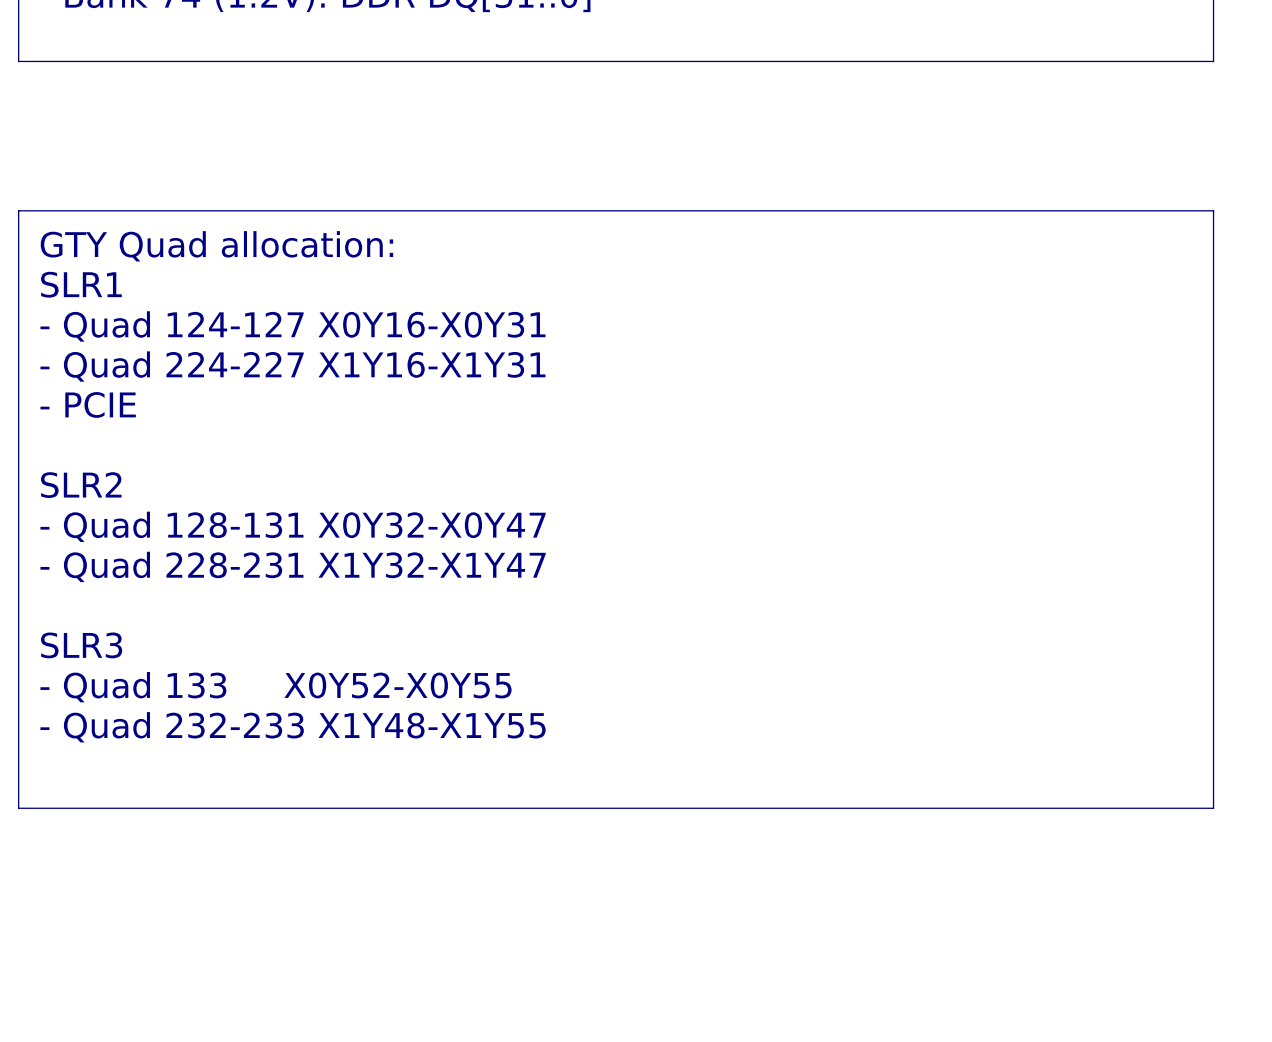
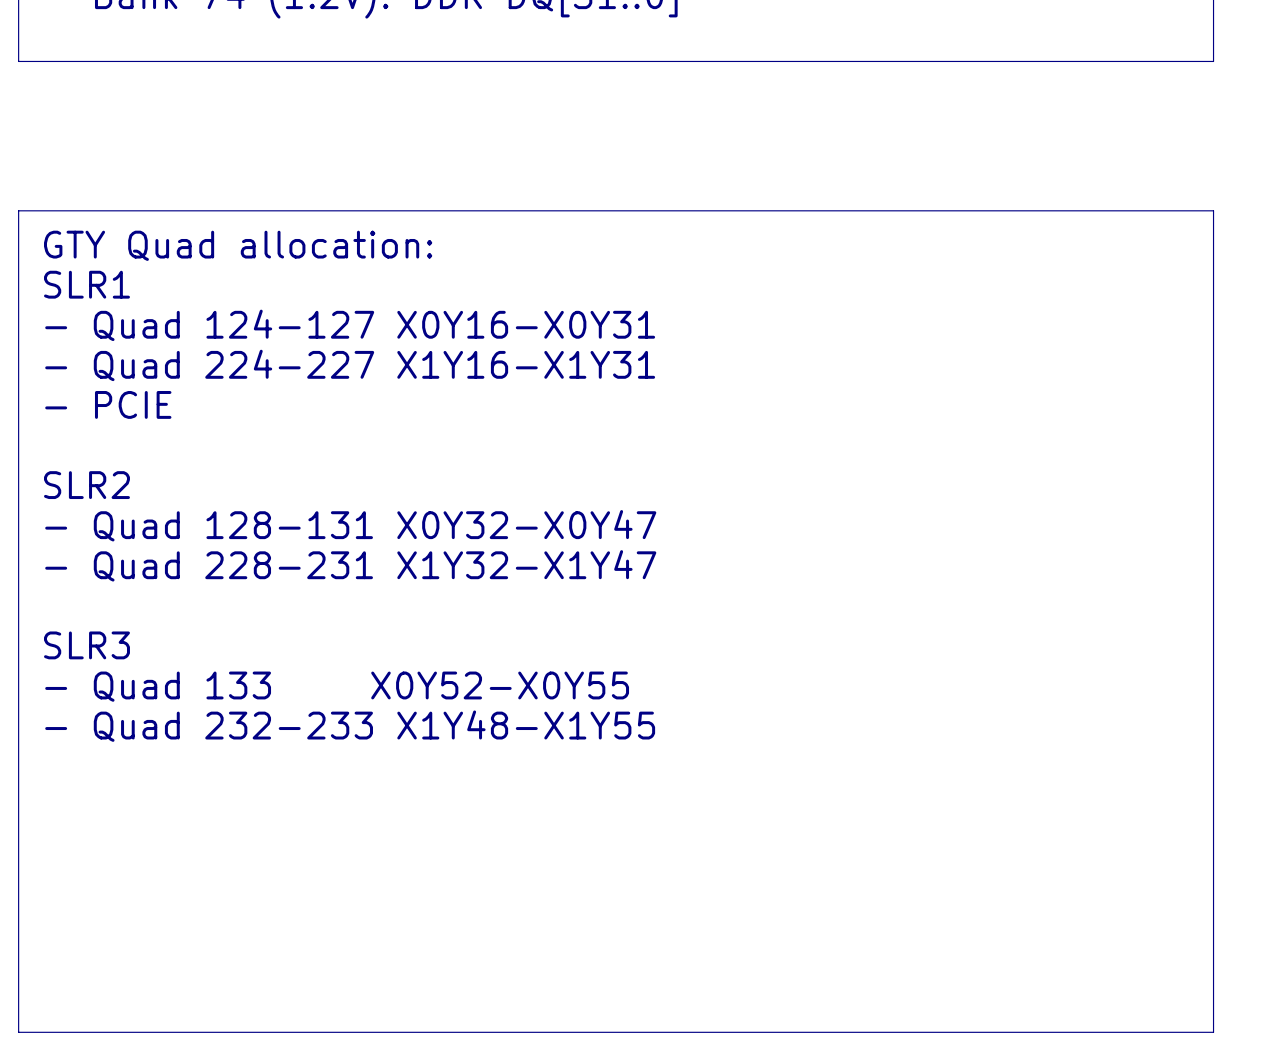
line: (18, 808) (1213, 808) -> (18, 808) (18, 1032) (1213, 1032) (1213, 808)

